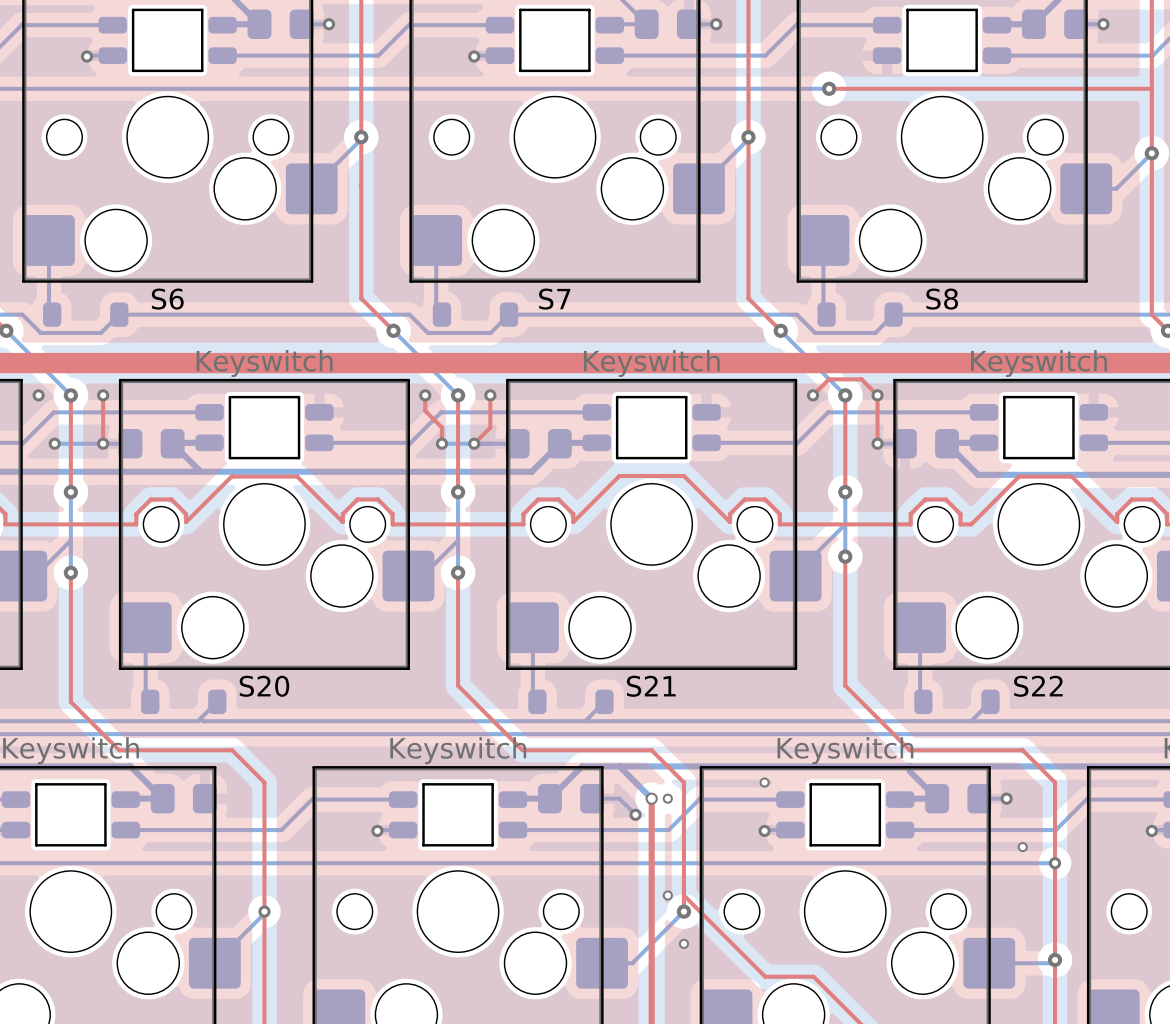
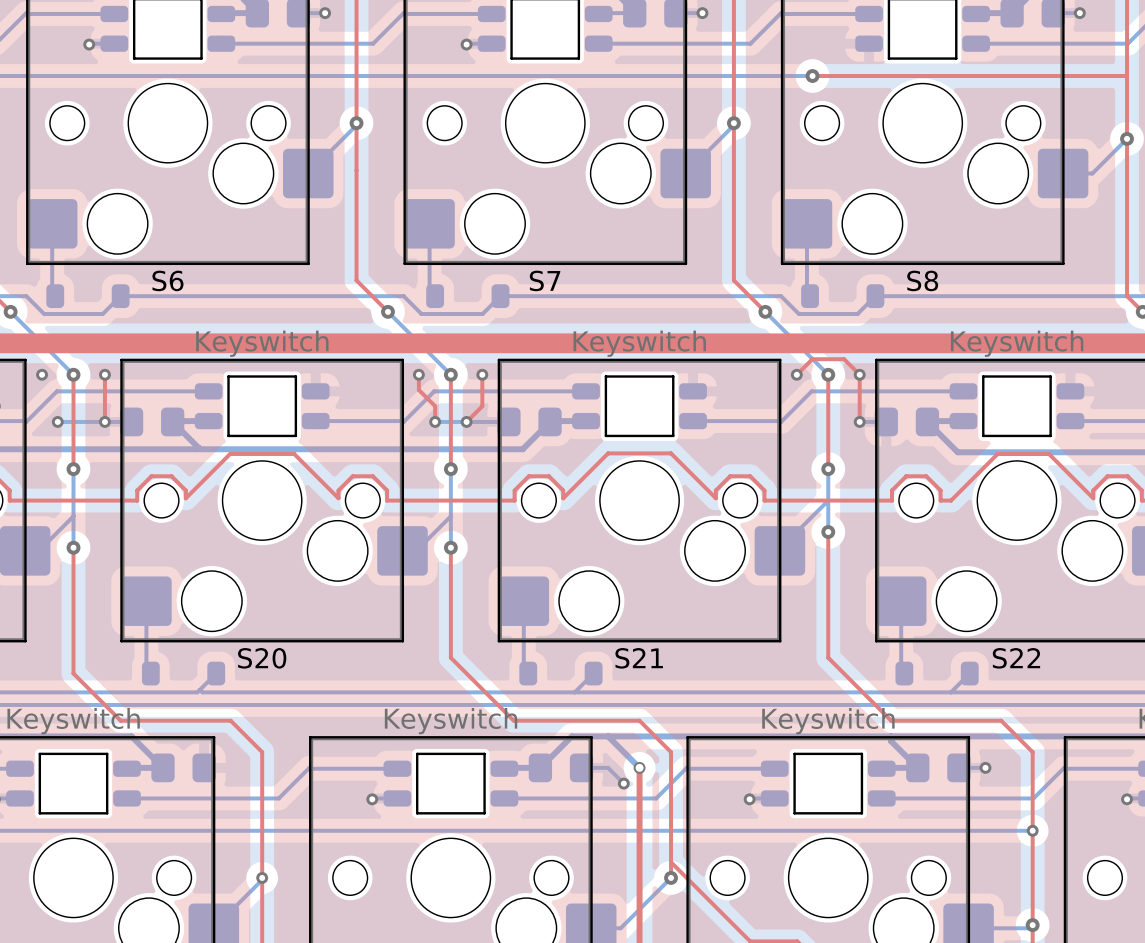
via: (764, 782) -> none
via: (667, 798) -> none
via: (1022, 847) -> none
via: (667, 895) -> none
via: (683, 943) -> none

